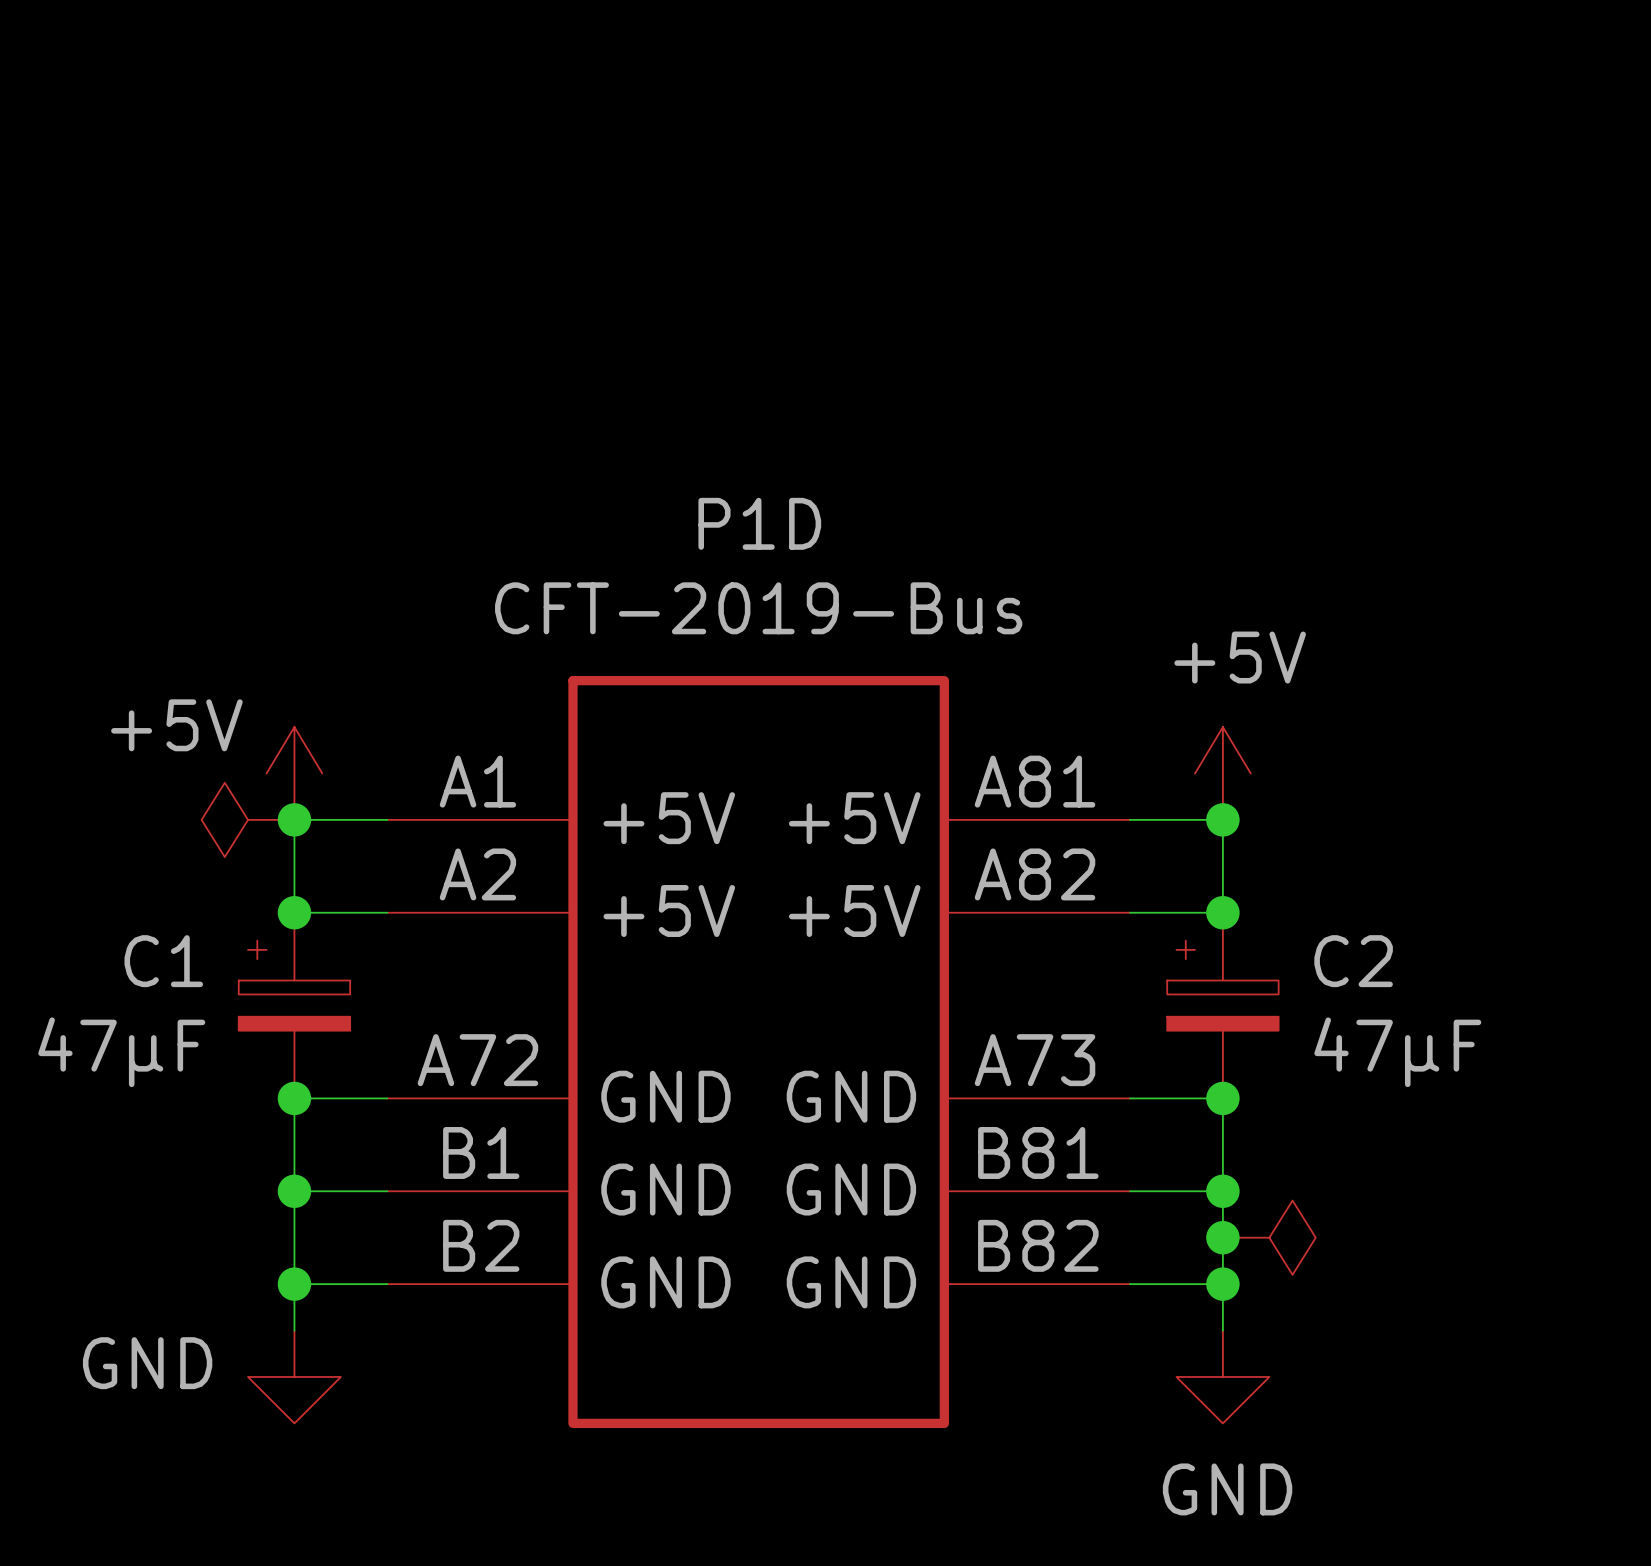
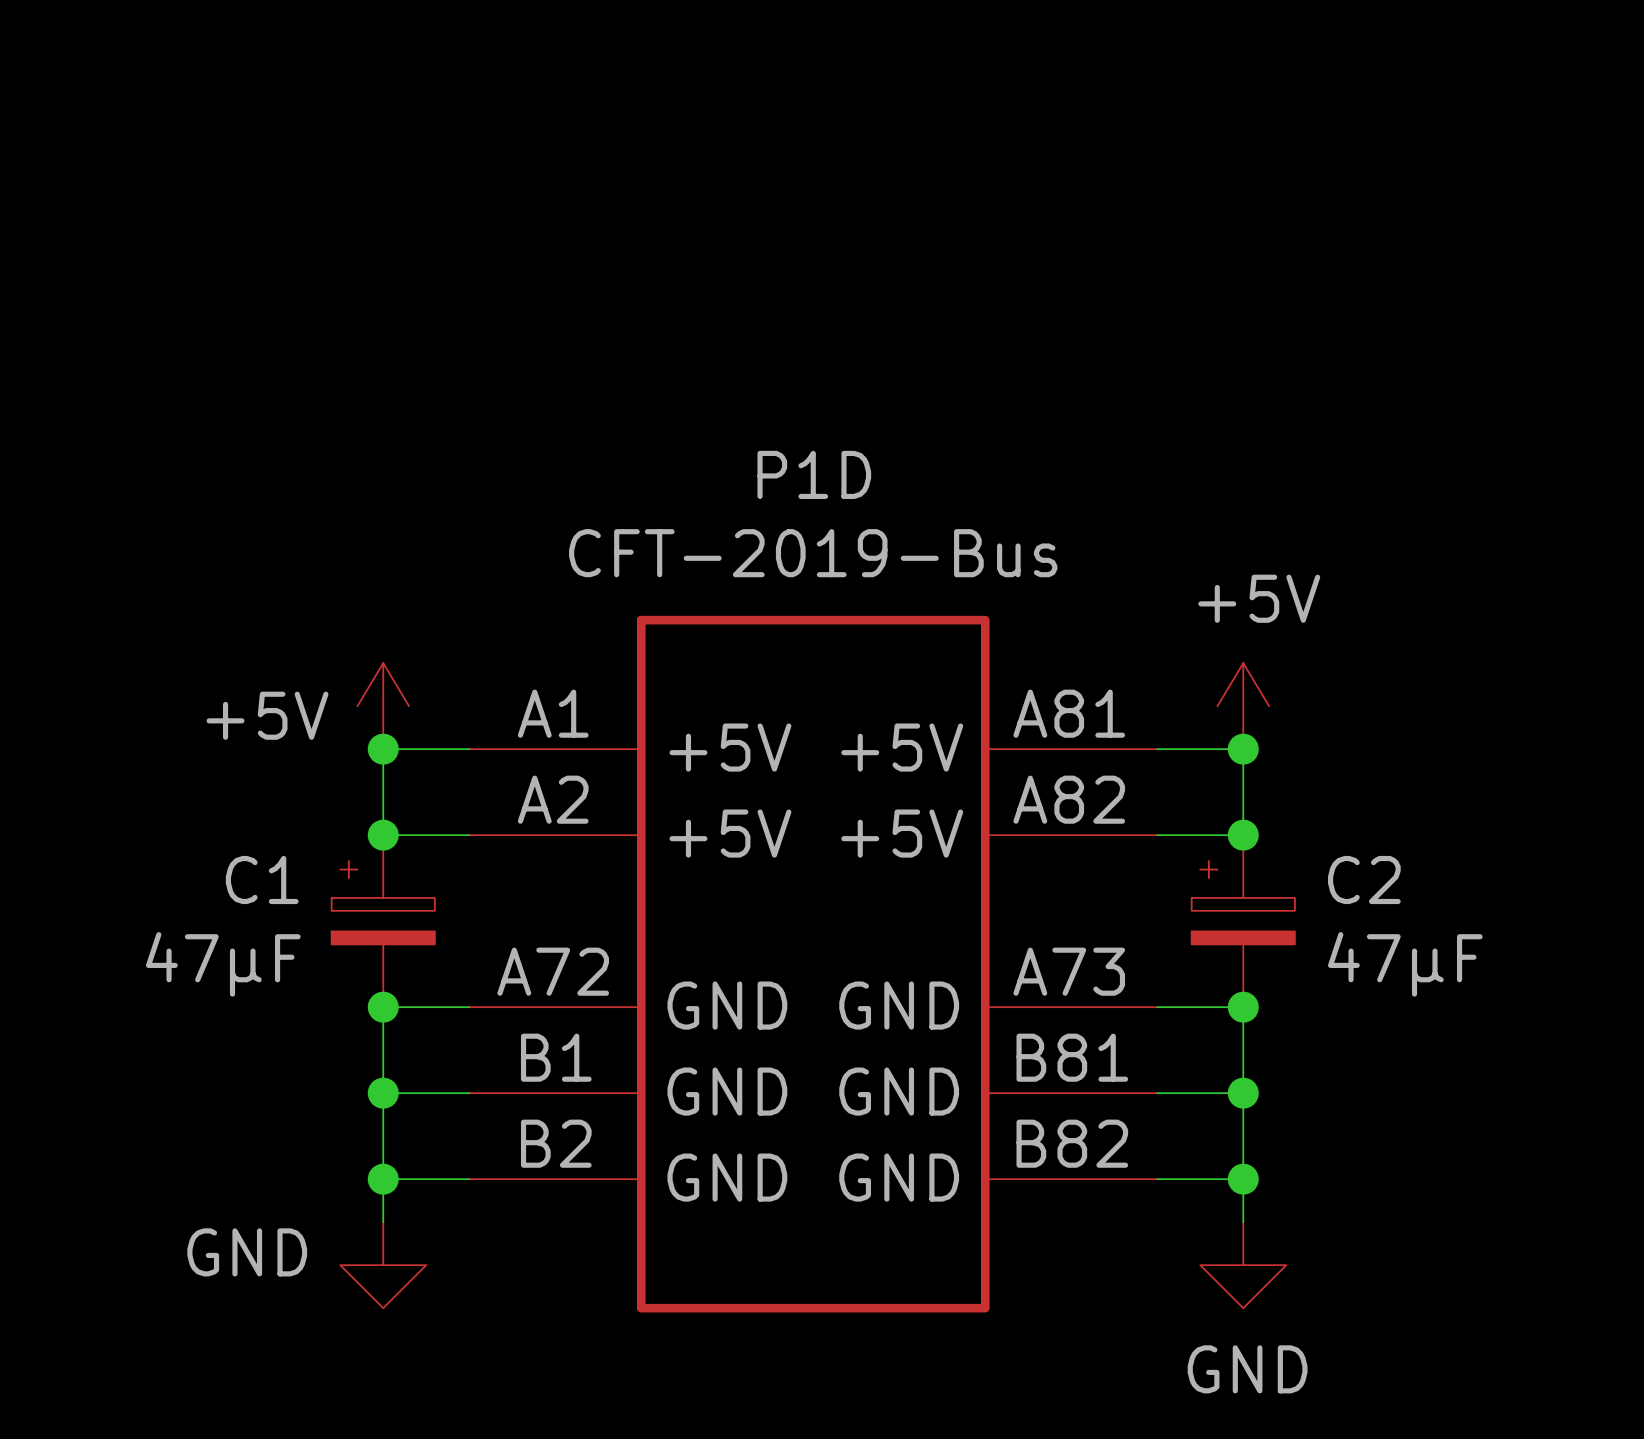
power symbol text position: +5V (176, 725) -> +5V (267, 715)
power symbol: (248, 819) -> none
junction: (1222, 1237) -> none
power symbol: (1269, 1237) -> none

